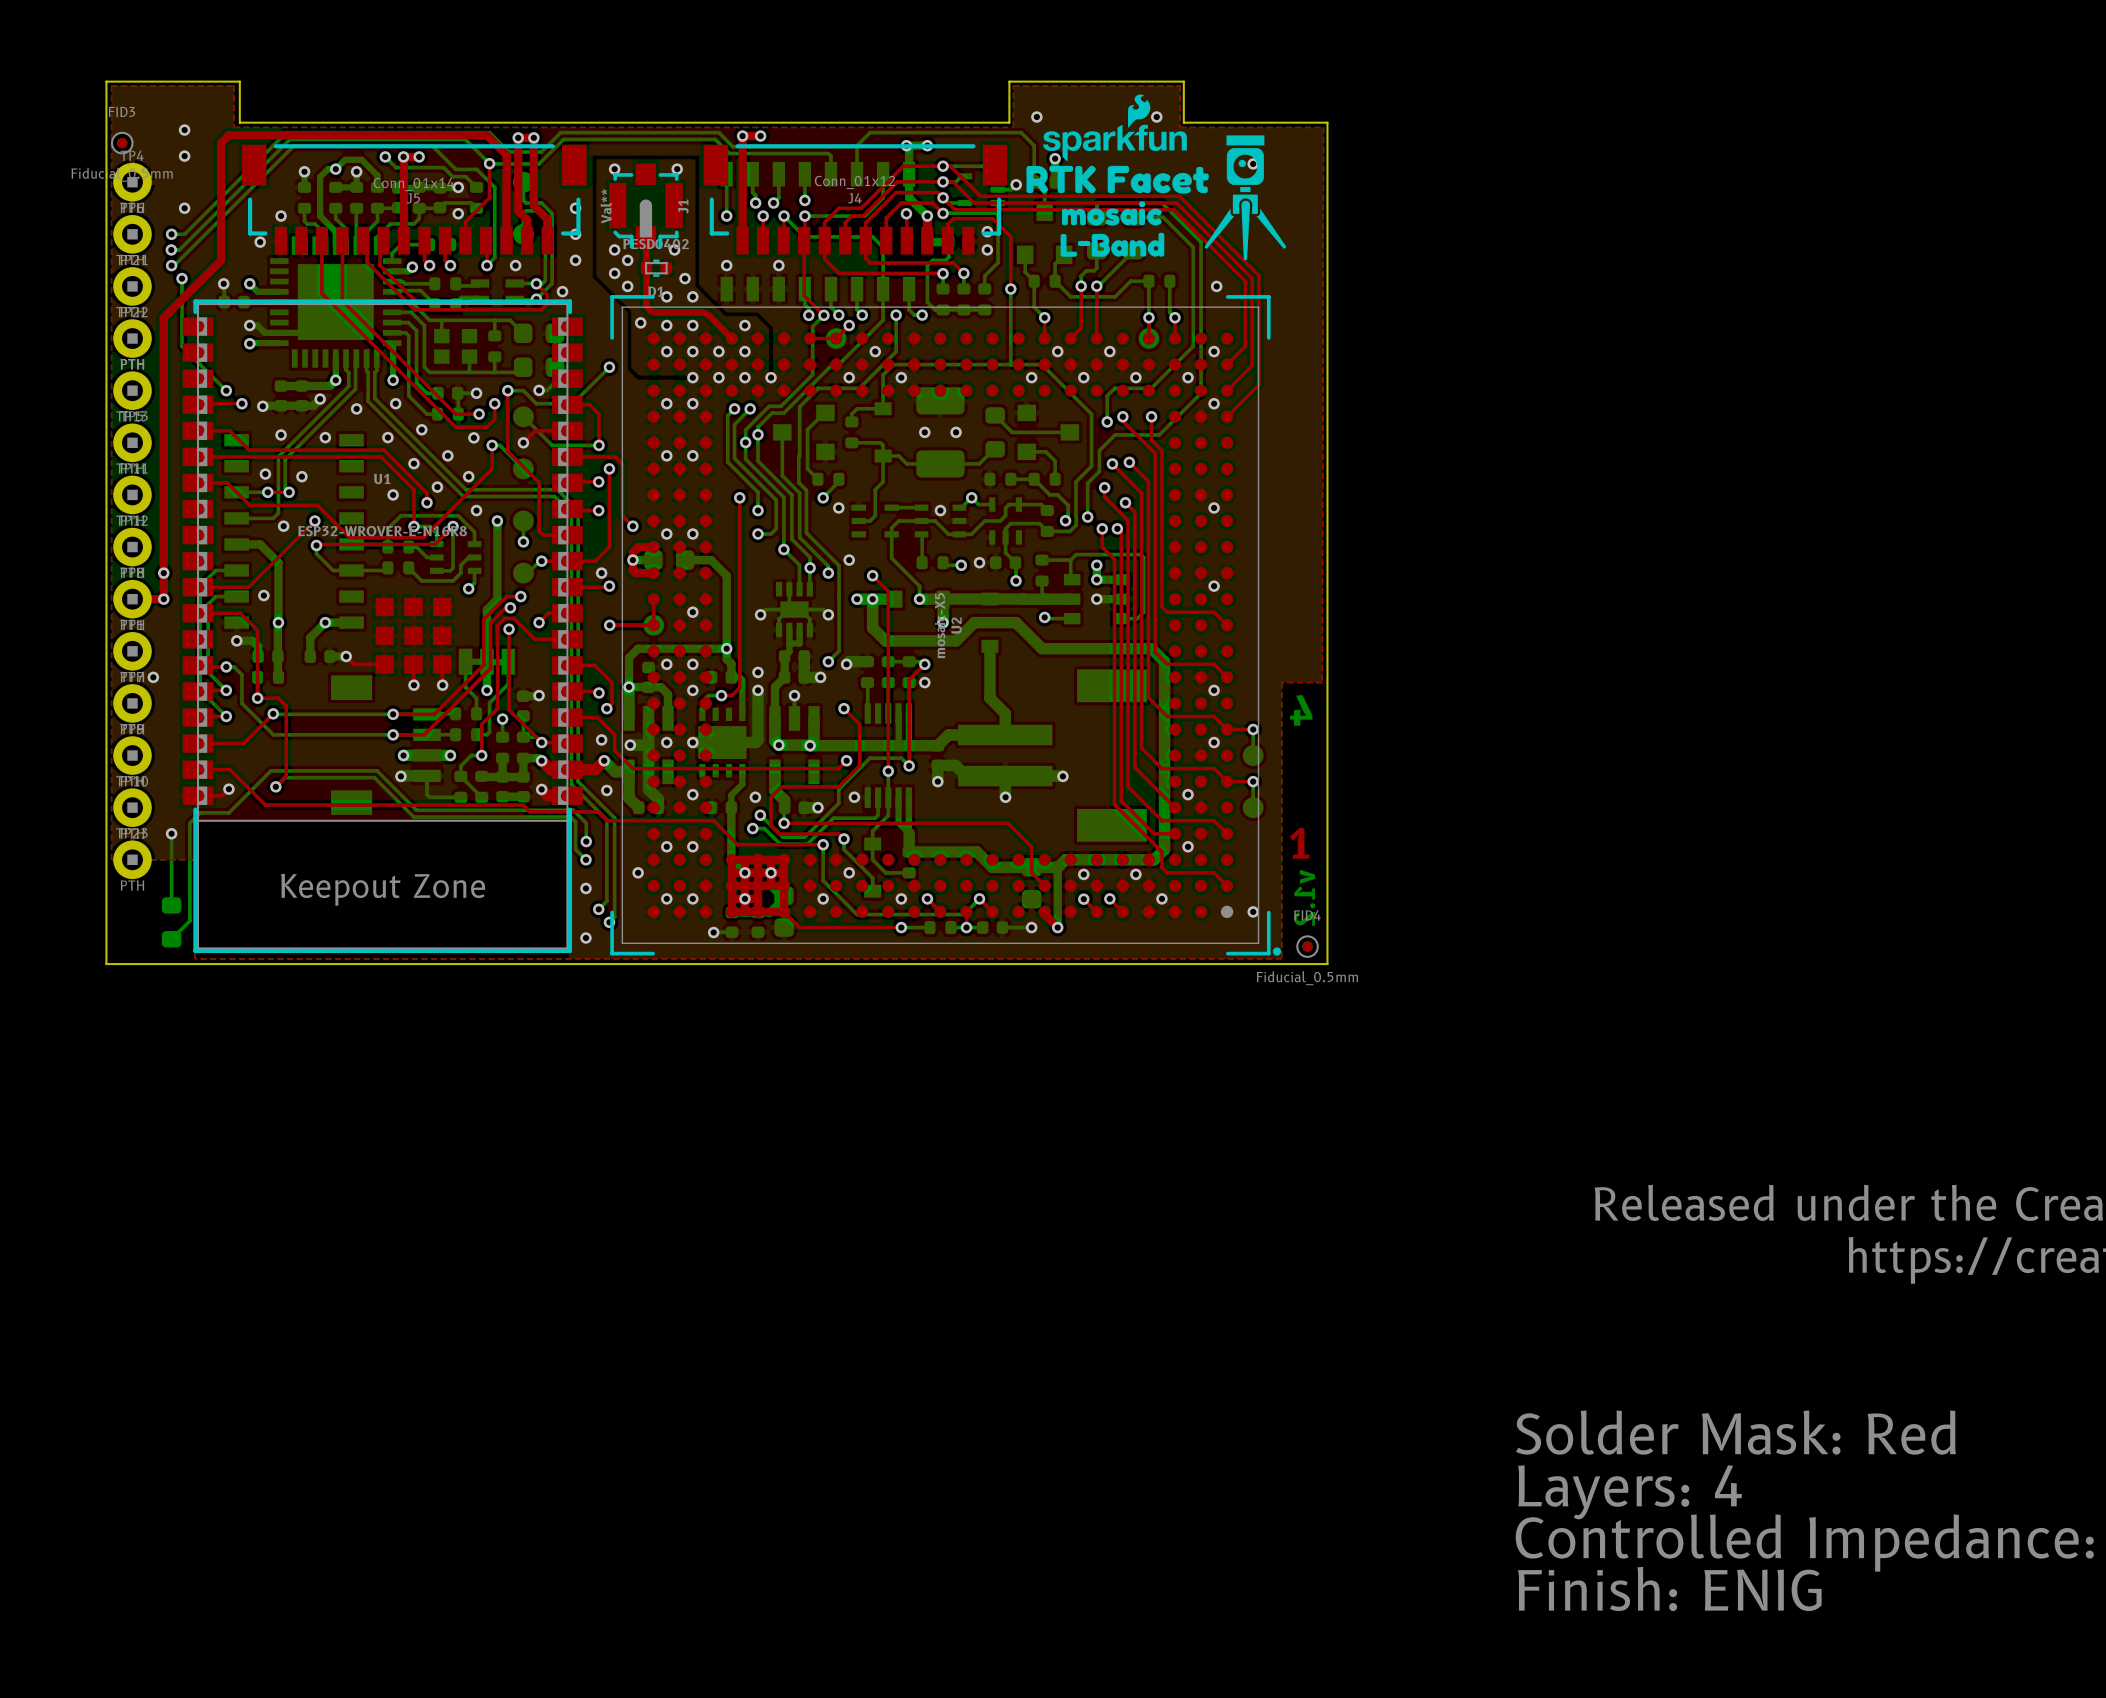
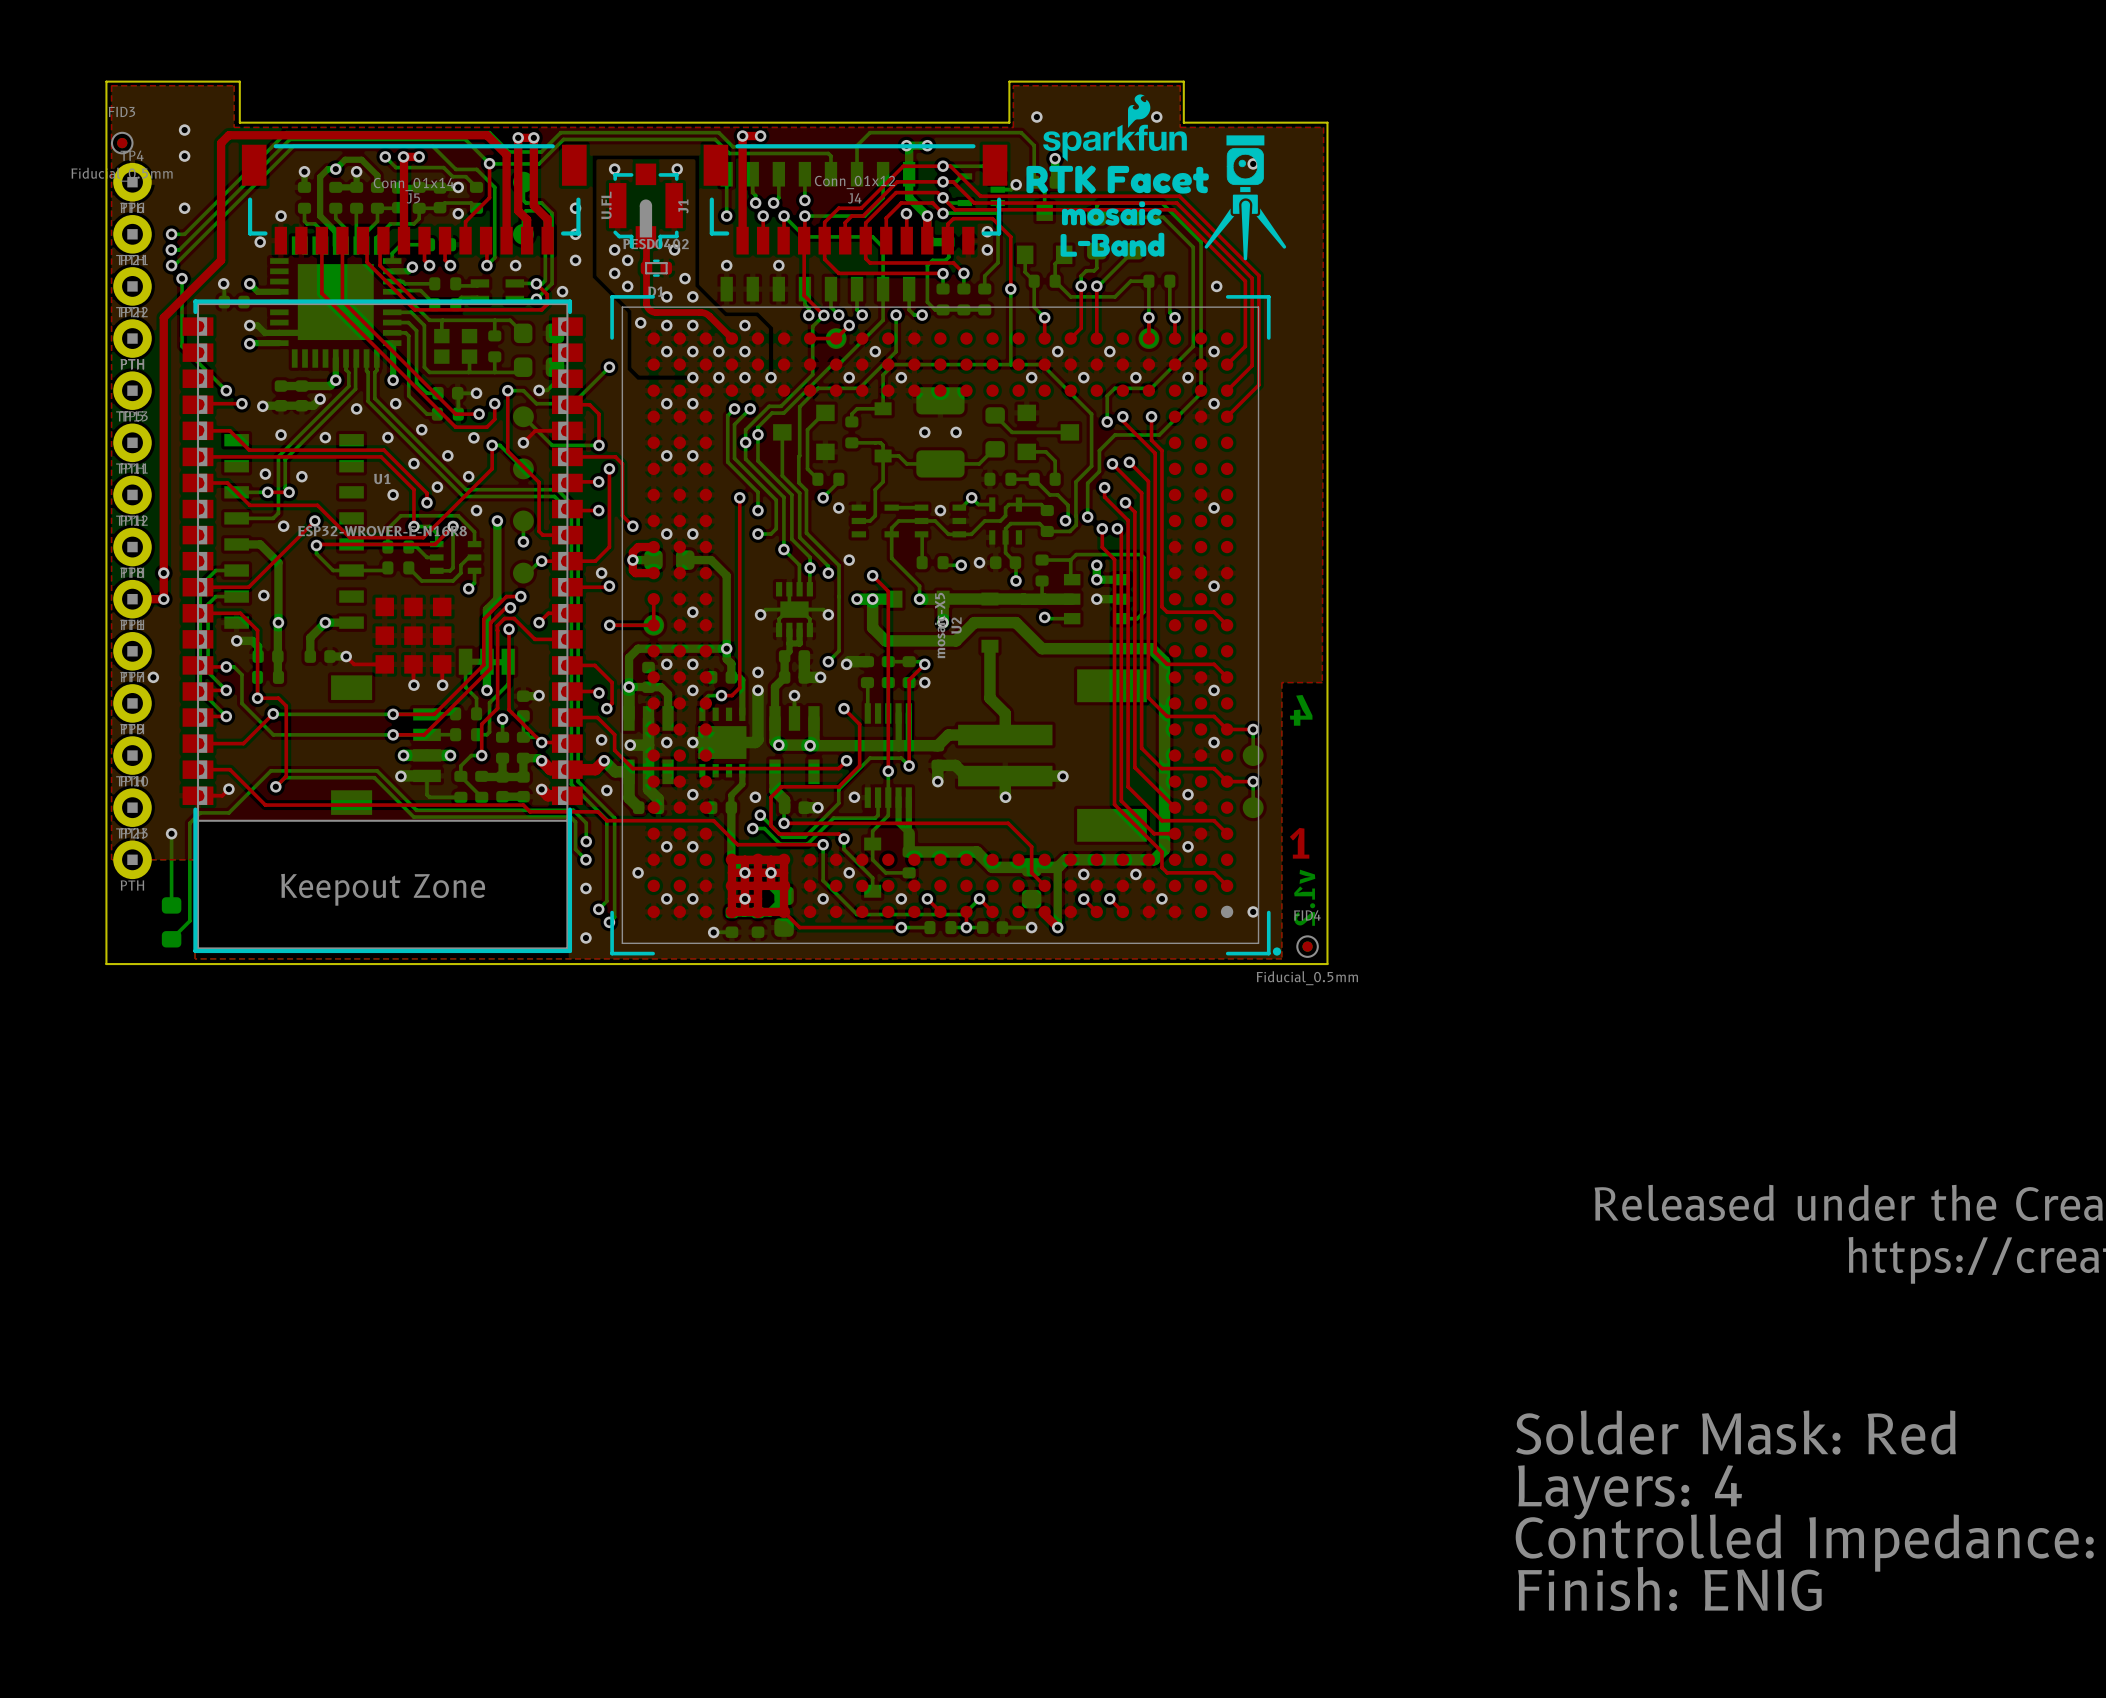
J1 value: Val** (606, 206) -> U.FL (606, 205)

